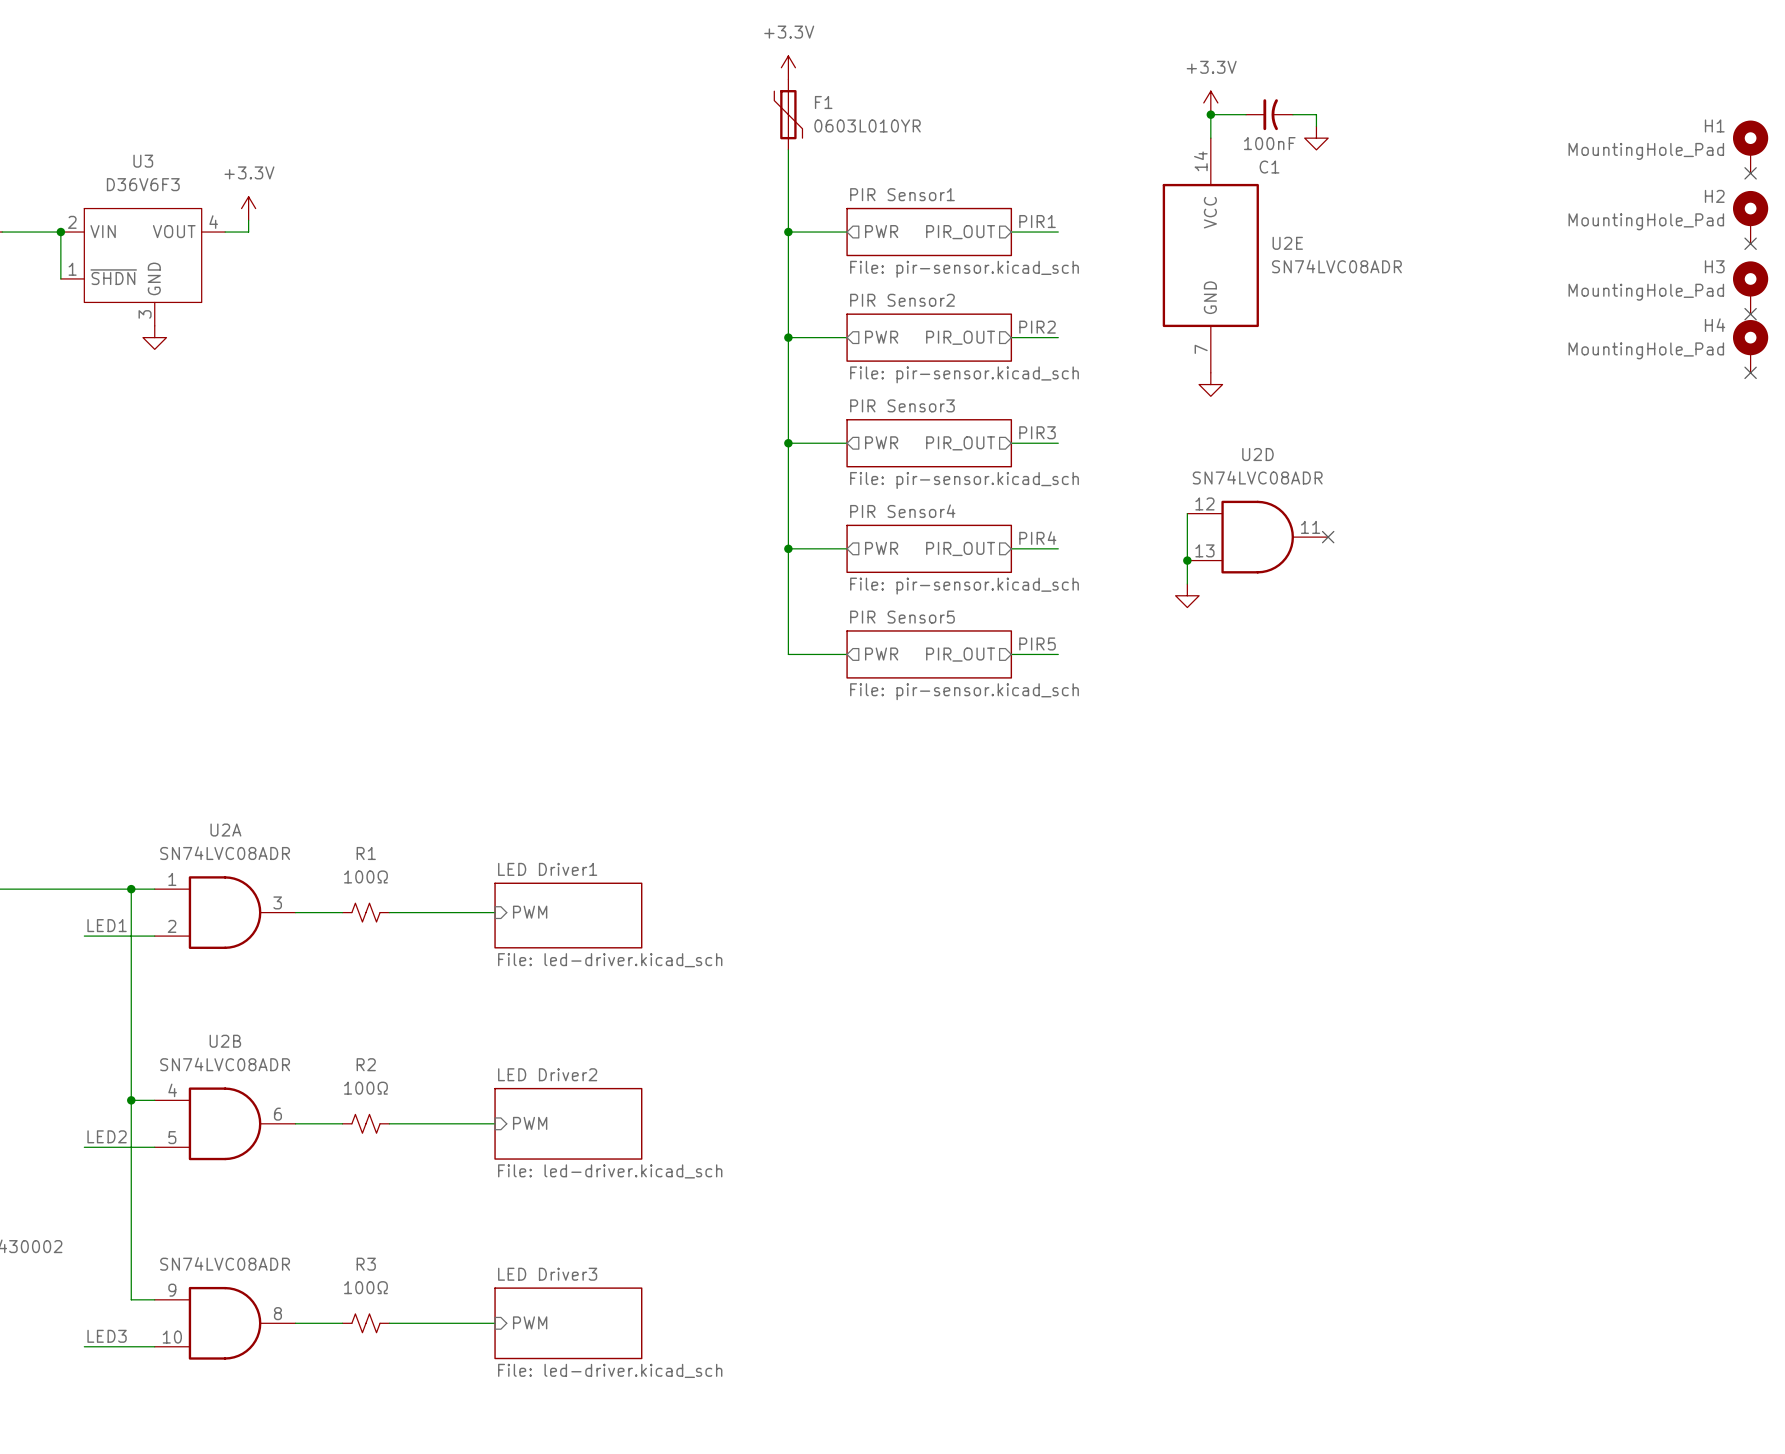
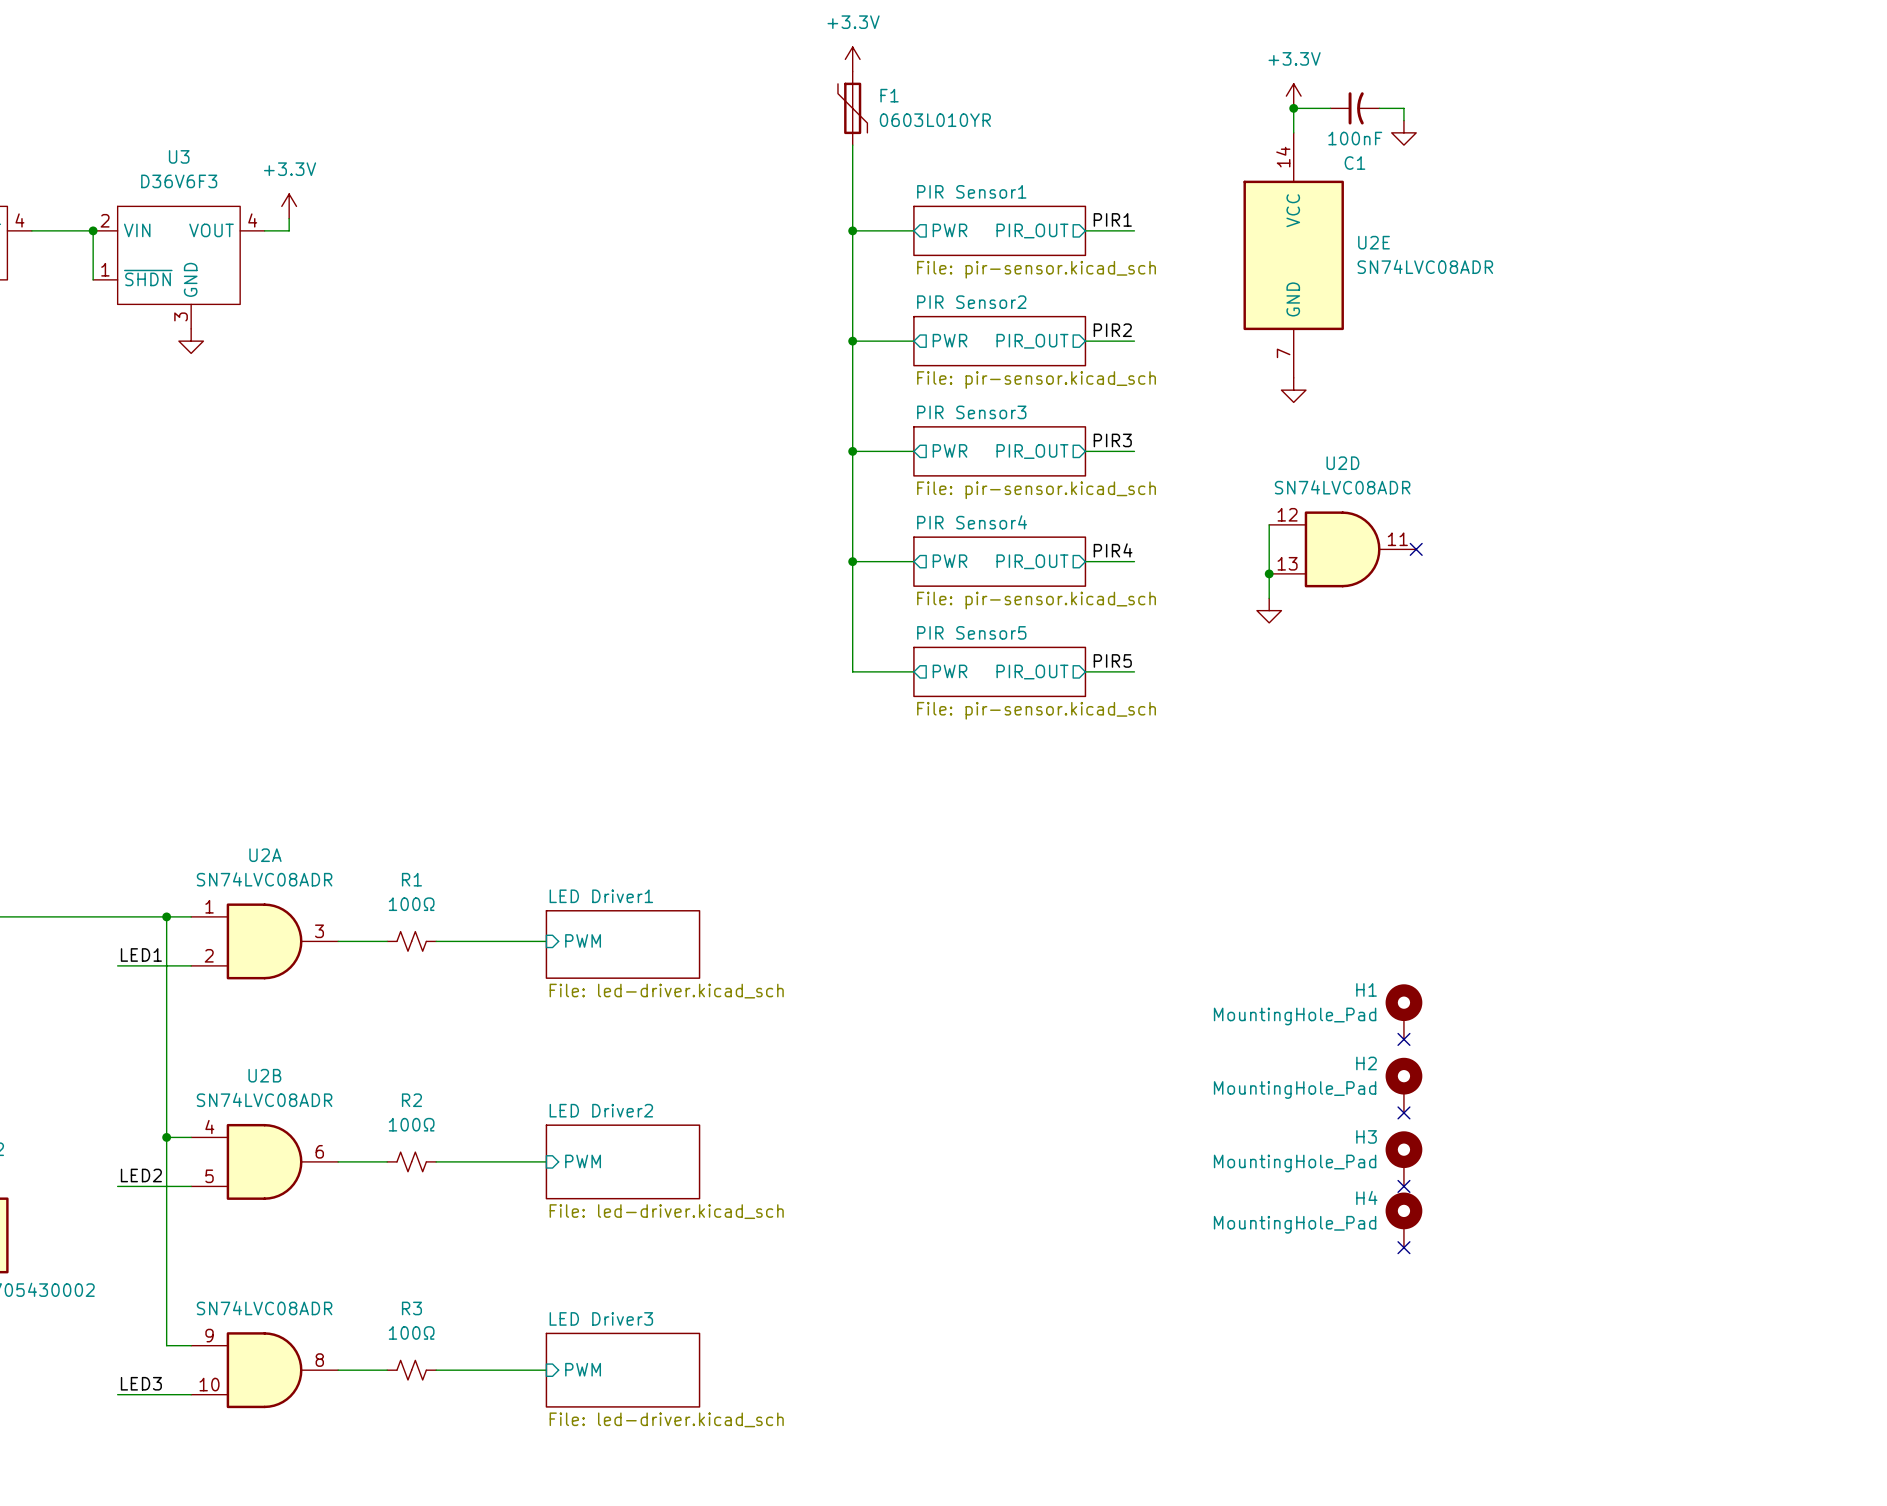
H1 position: (1750, 146) -> (1403, 1011)
no-connect mark: (1750, 173) -> none
H2 position: (1750, 217) -> (1403, 1085)
no-connect mark: (1750, 243) -> none
H3 position: (1750, 287) -> (1403, 1158)
no-connect mark: (1750, 314) -> none
H4 position: (1750, 346) -> (1403, 1220)
no-connect mark: (1750, 372) -> none
no-connect mark: none -> (1403, 1039)
no-connect mark: none -> (1403, 1112)
no-connect mark: none -> (1403, 1186)
no-connect mark: none -> (1403, 1247)

